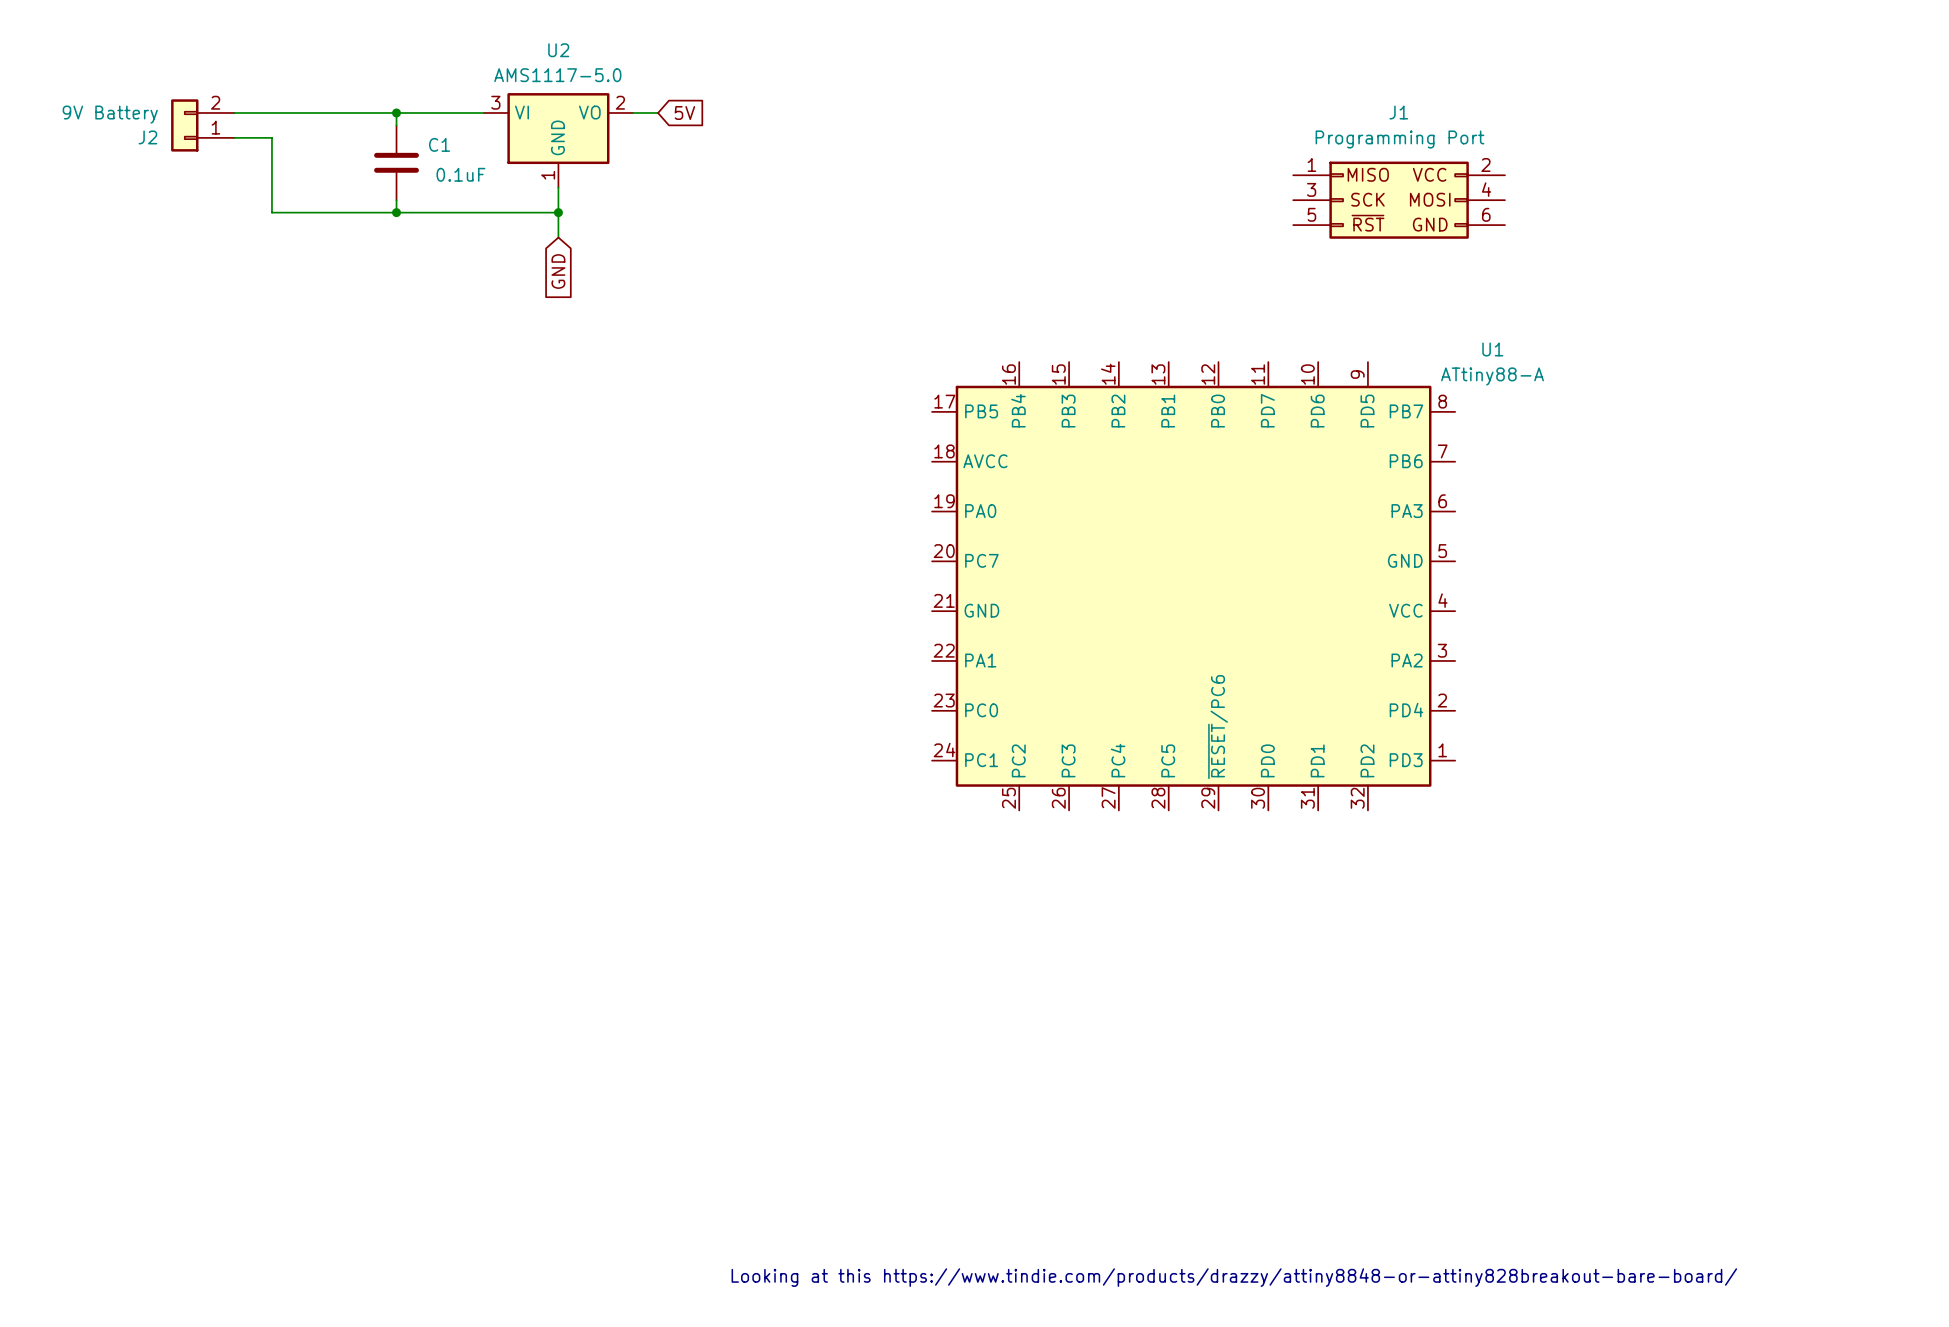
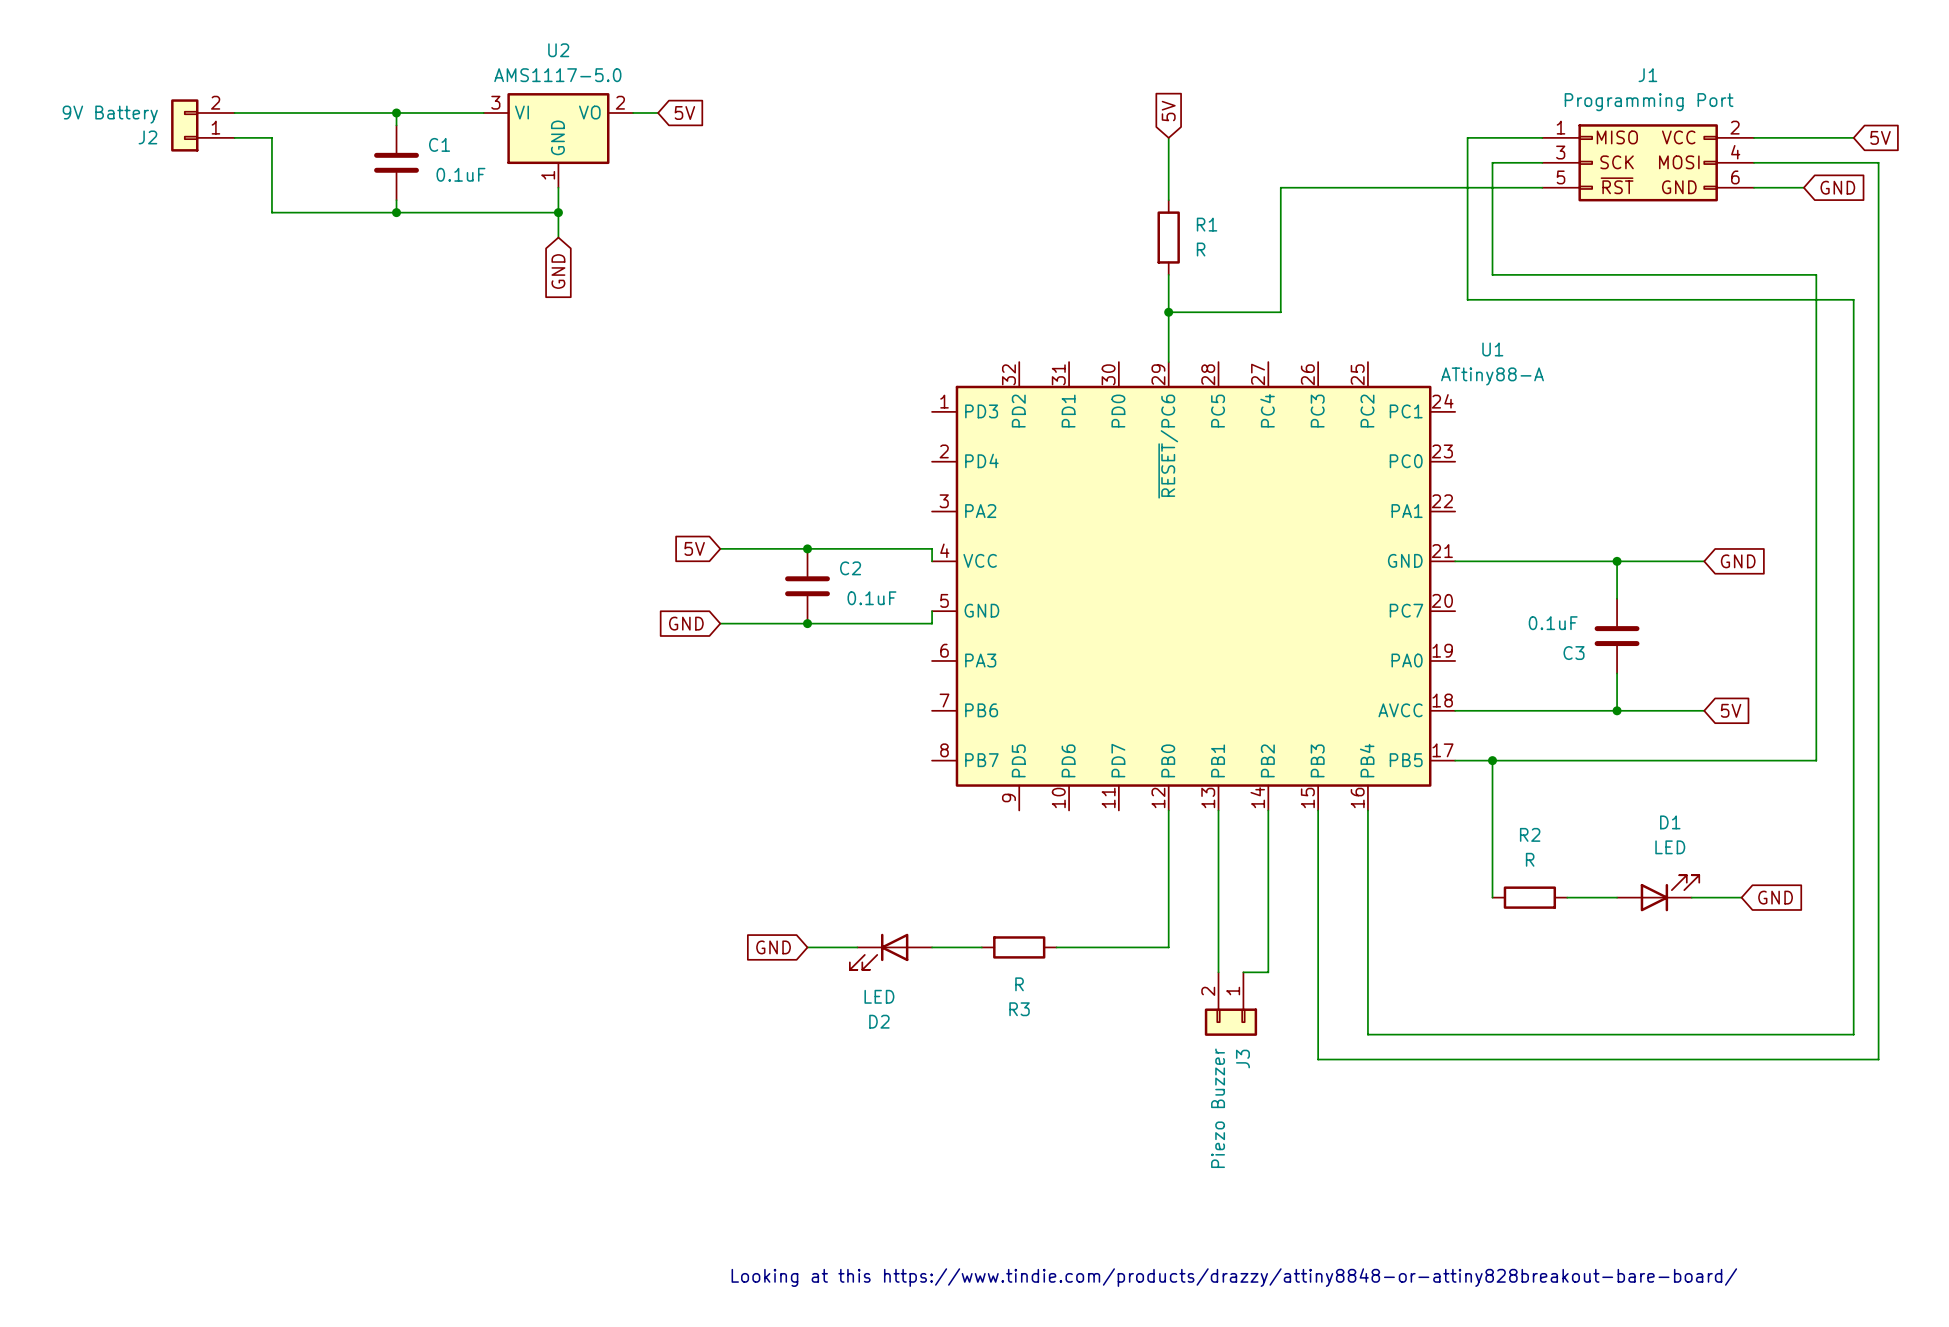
global label: none -> 5V (1168, 111)
wire: none -> (1168, 137) (1168, 200)
wire: none -> (1542, 137) (1467, 137) (1467, 299) (1853, 299) (1853, 1034) (1367, 1034) (1367, 810)
wire: none -> (1754, 137) (1853, 137)
global label: none -> 5V (1880, 137)
wire: none -> (1542, 162) (1492, 162) (1492, 274) (1816, 274) (1816, 760) (1455, 760)
wire: none -> (1754, 162) (1878, 162) (1878, 1059) (1318, 1059) (1318, 810)
wire: none -> (1542, 187) (1280, 187) (1280, 312) (1168, 312)
wire: none -> (1754, 187) (1803, 187)
global label: none -> GND (1837, 187)
J1 position: (1399, 200) -> (1648, 162)
R1: none -> R (1168, 237)
wire: none -> (1168, 274) (1168, 362)
junction: none -> (1168, 312)
global label: none -> 5V (694, 548)
wire: none -> (720, 548) (932, 548) (932, 561)
junction: none -> (807, 548)
wire: none -> (1455, 561) (1704, 561)
wire: none -> (1617, 561) (1617, 598)
junction: none -> (1617, 561)
global label: none -> GND (1738, 561)
C2: none -> 0.1uF (807, 586)
U1 rotation: 0° (1193, 586) -> 180° (1193, 586)
wire: none -> (932, 611) (932, 623) (720, 623)
global label: none -> GND (686, 623)
junction: none -> (807, 623)
C3: none -> 0.1uF (1617, 636)
wire: none -> (1617, 673) (1617, 710)
wire: none -> (1455, 710) (1704, 710)
junction: none -> (1617, 710)
global label: none -> 5V (1731, 710)
wire: none -> (1492, 760) (1492, 897)
junction: none -> (1492, 760)
wire: none -> (1168, 810) (1168, 947) (1056, 947)
wire: none -> (1218, 810) (1218, 972)
wire: none -> (1268, 810) (1268, 972) (1243, 972)
D1: none -> LED (1658, 893)
R2: none -> R (1529, 897)
wire: none -> (1567, 897) (1617, 897)
wire: none -> (1691, 897) (1741, 897)
global label: none -> GND (1775, 897)
global label: none -> GND (773, 947)
wire: none -> (807, 947) (857, 947)
wire: none -> (932, 947) (981, 947)
R3: none -> R (1019, 947)
D2: none -> LED (890, 951)
J3: none -> Piezo Buzzer (1230, 1004)

